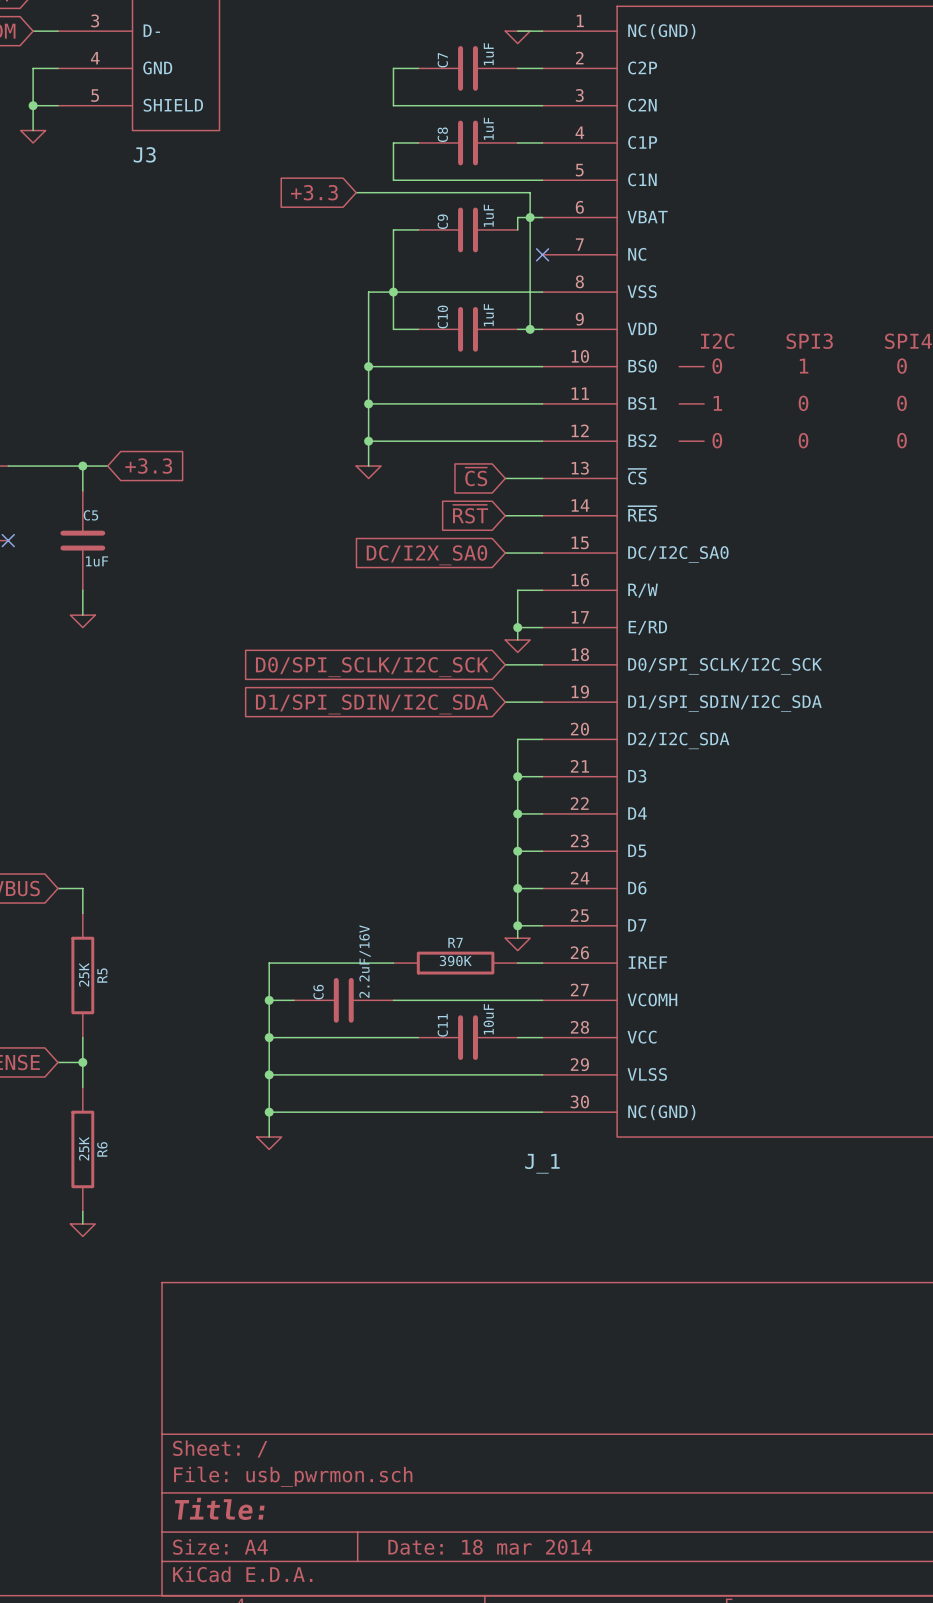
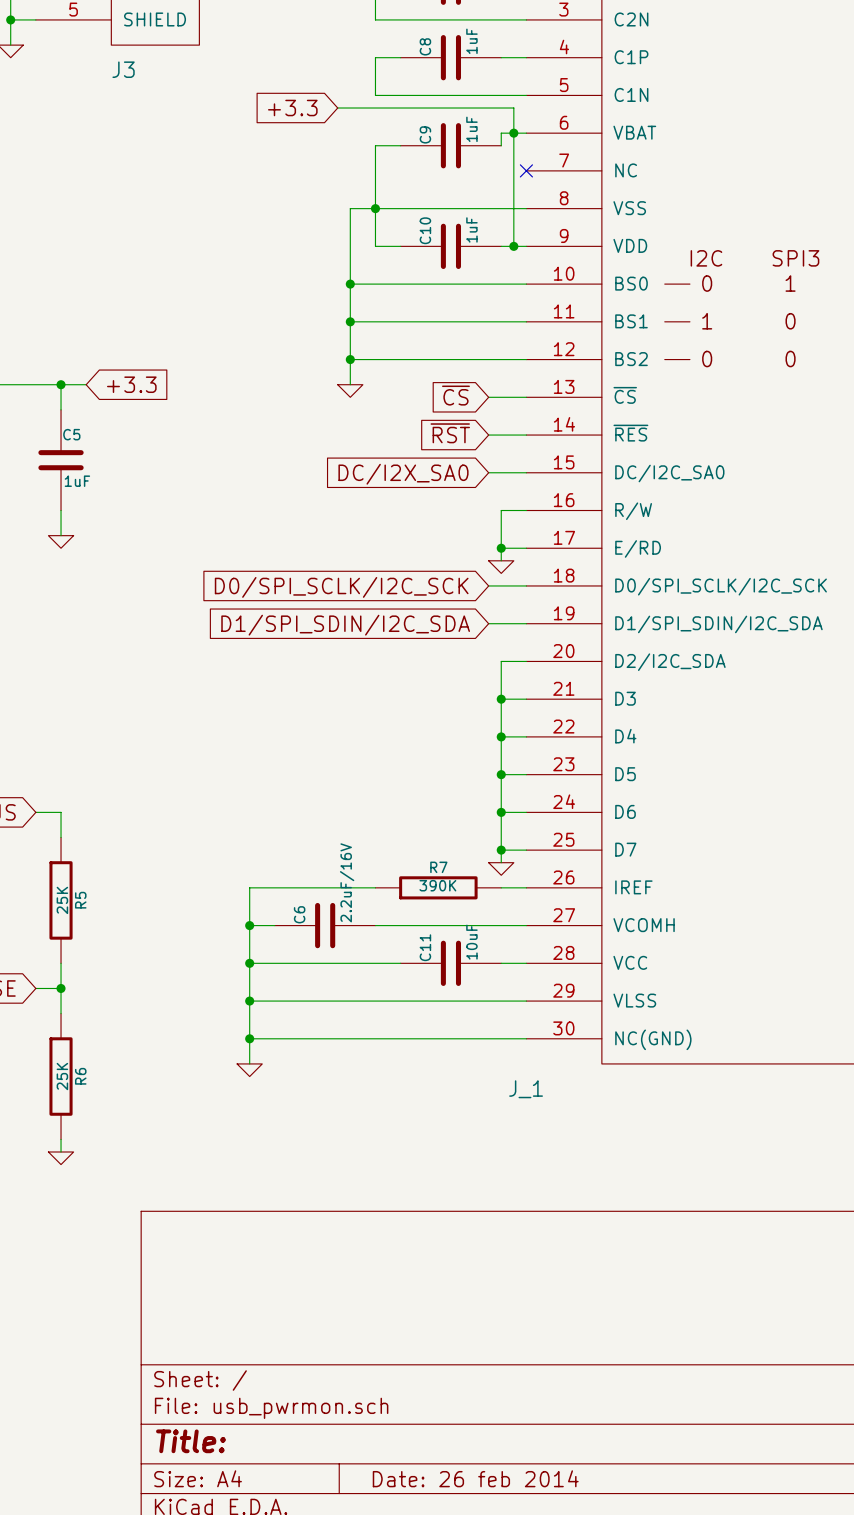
title block: Date: 18 mar 2014 (490, 1547) -> Date: 26 feb 2014 (475, 1478)

